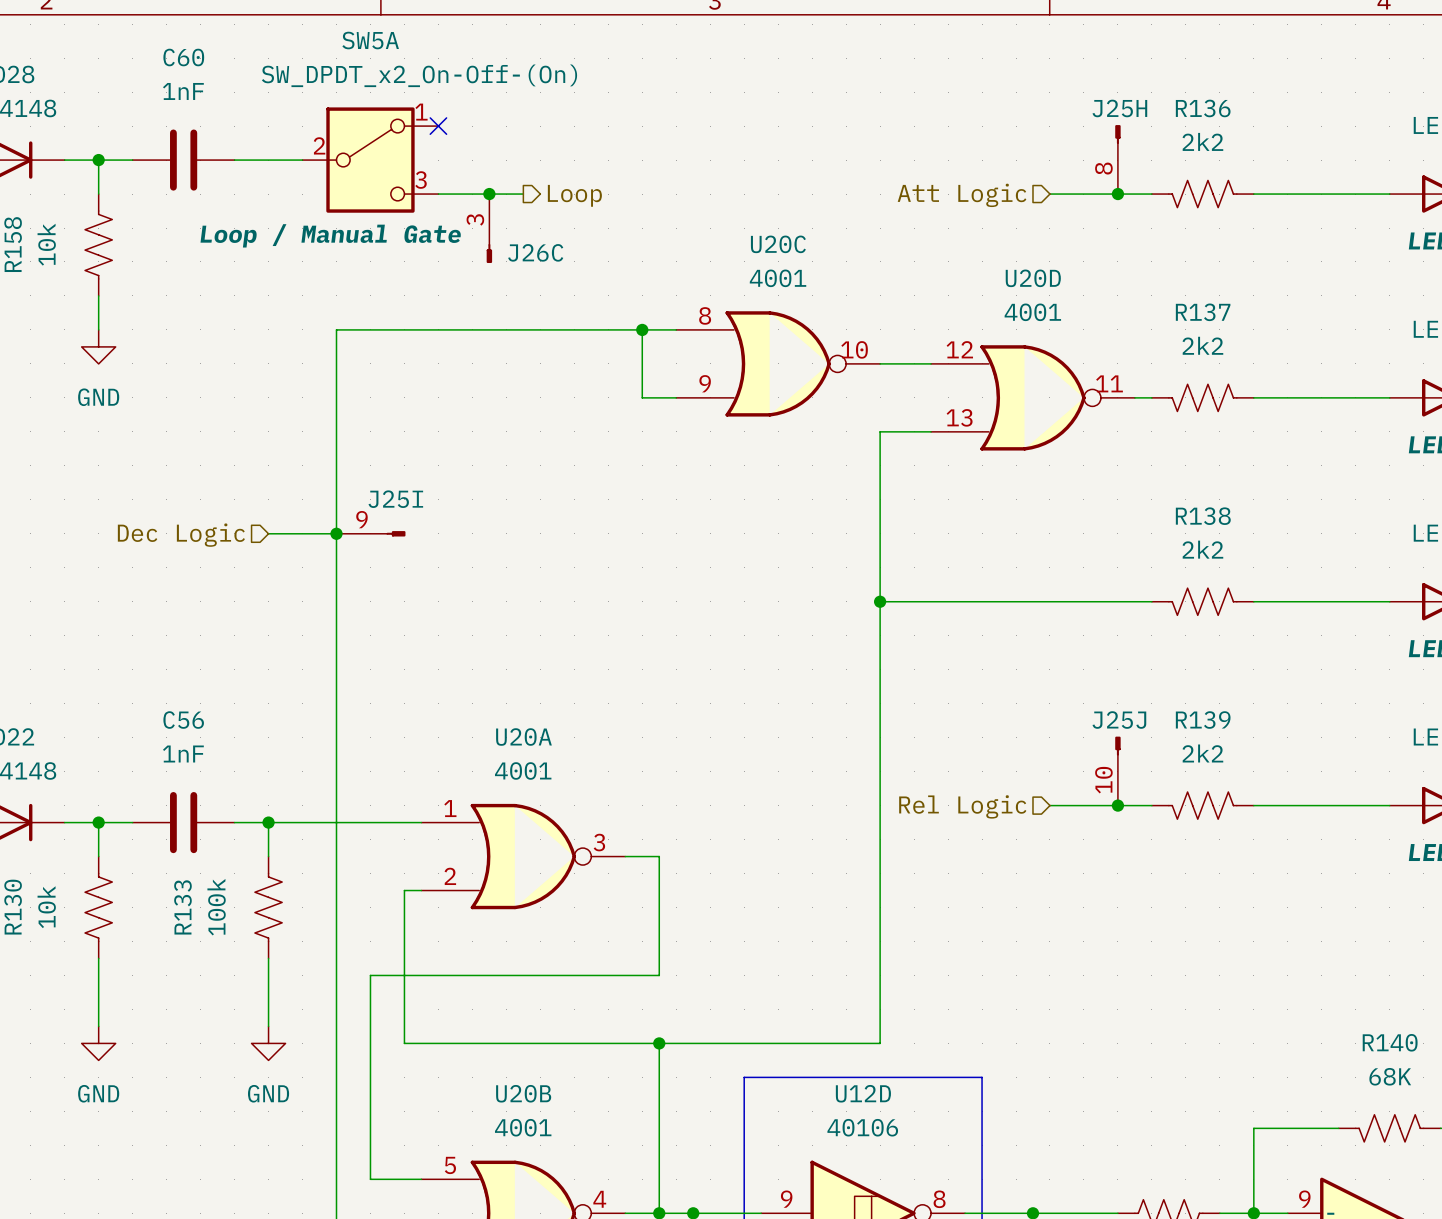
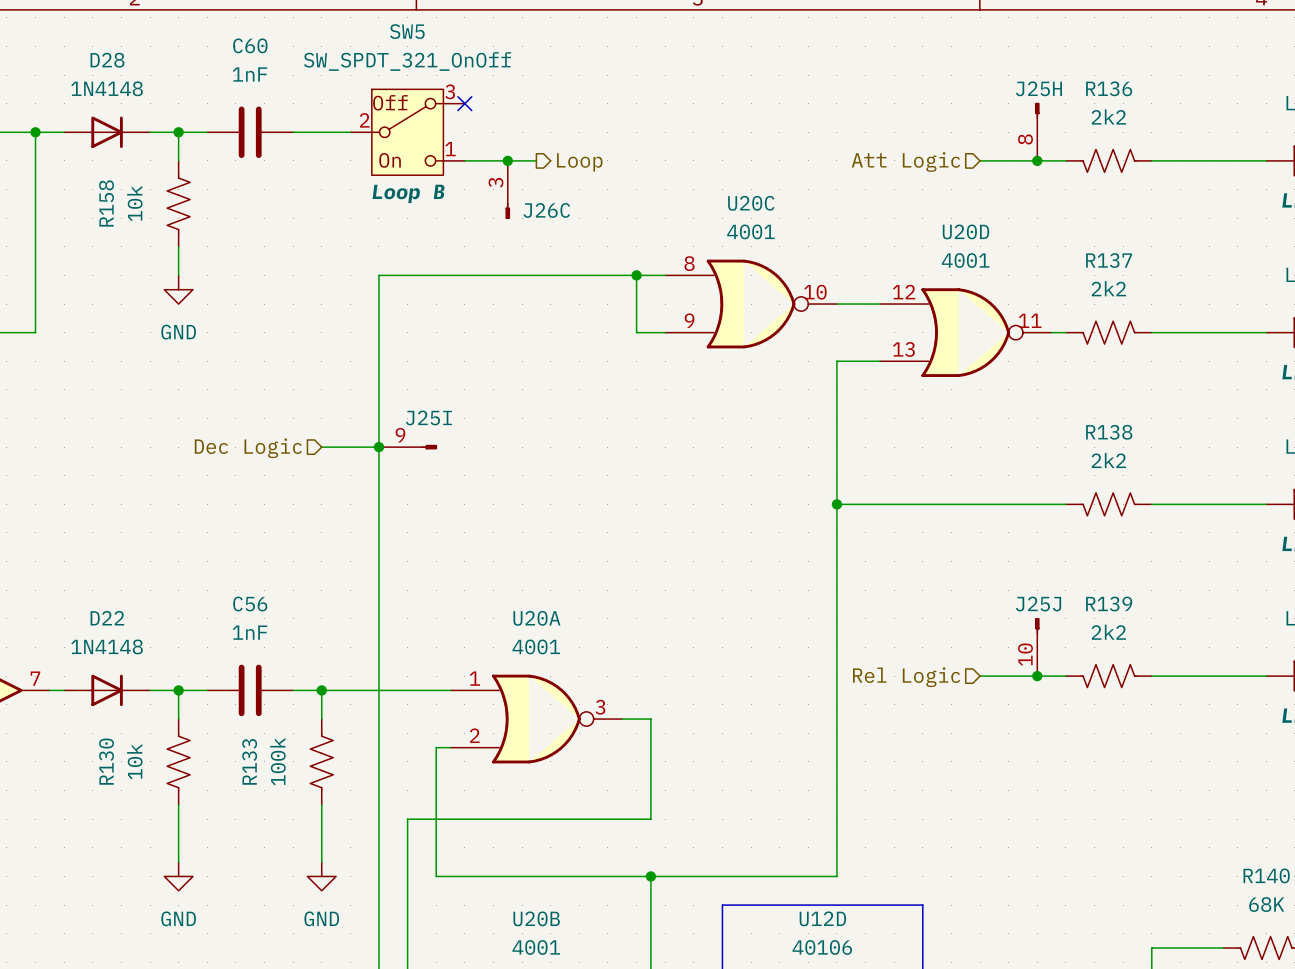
SW5A: SW_DPDT_x2_On-Off-(On) (370, 160) -> none
SW5: none -> SW_SPDT_321_OnOff (407, 132)

